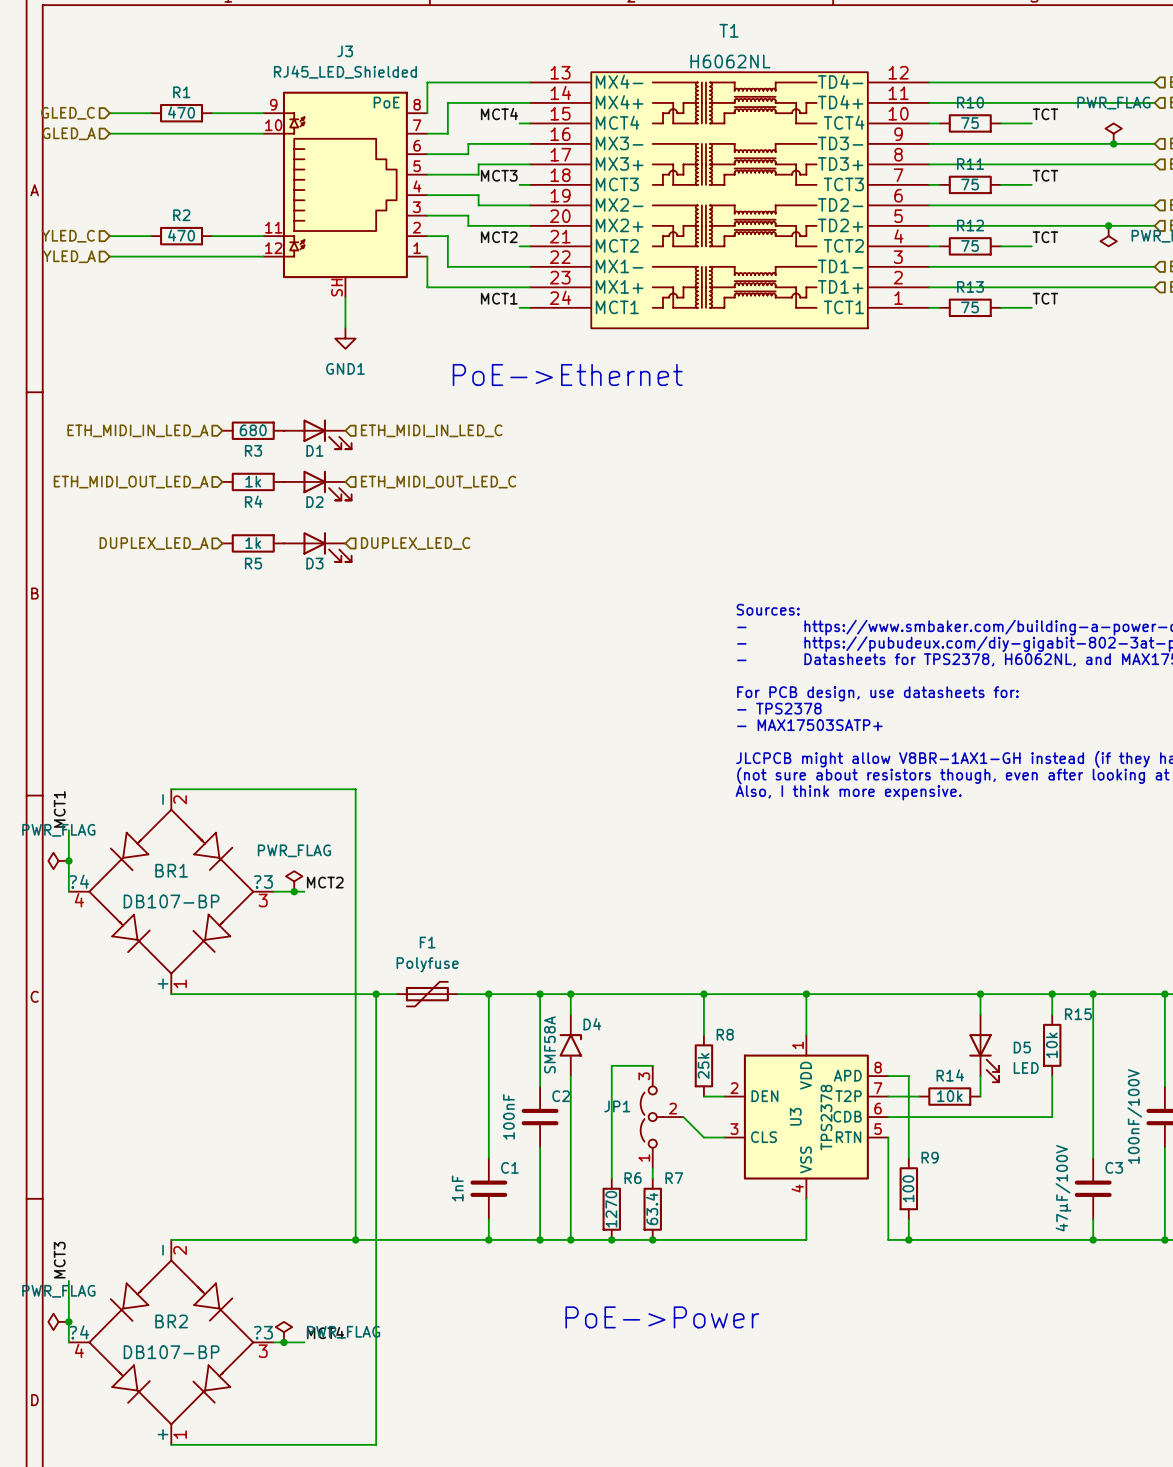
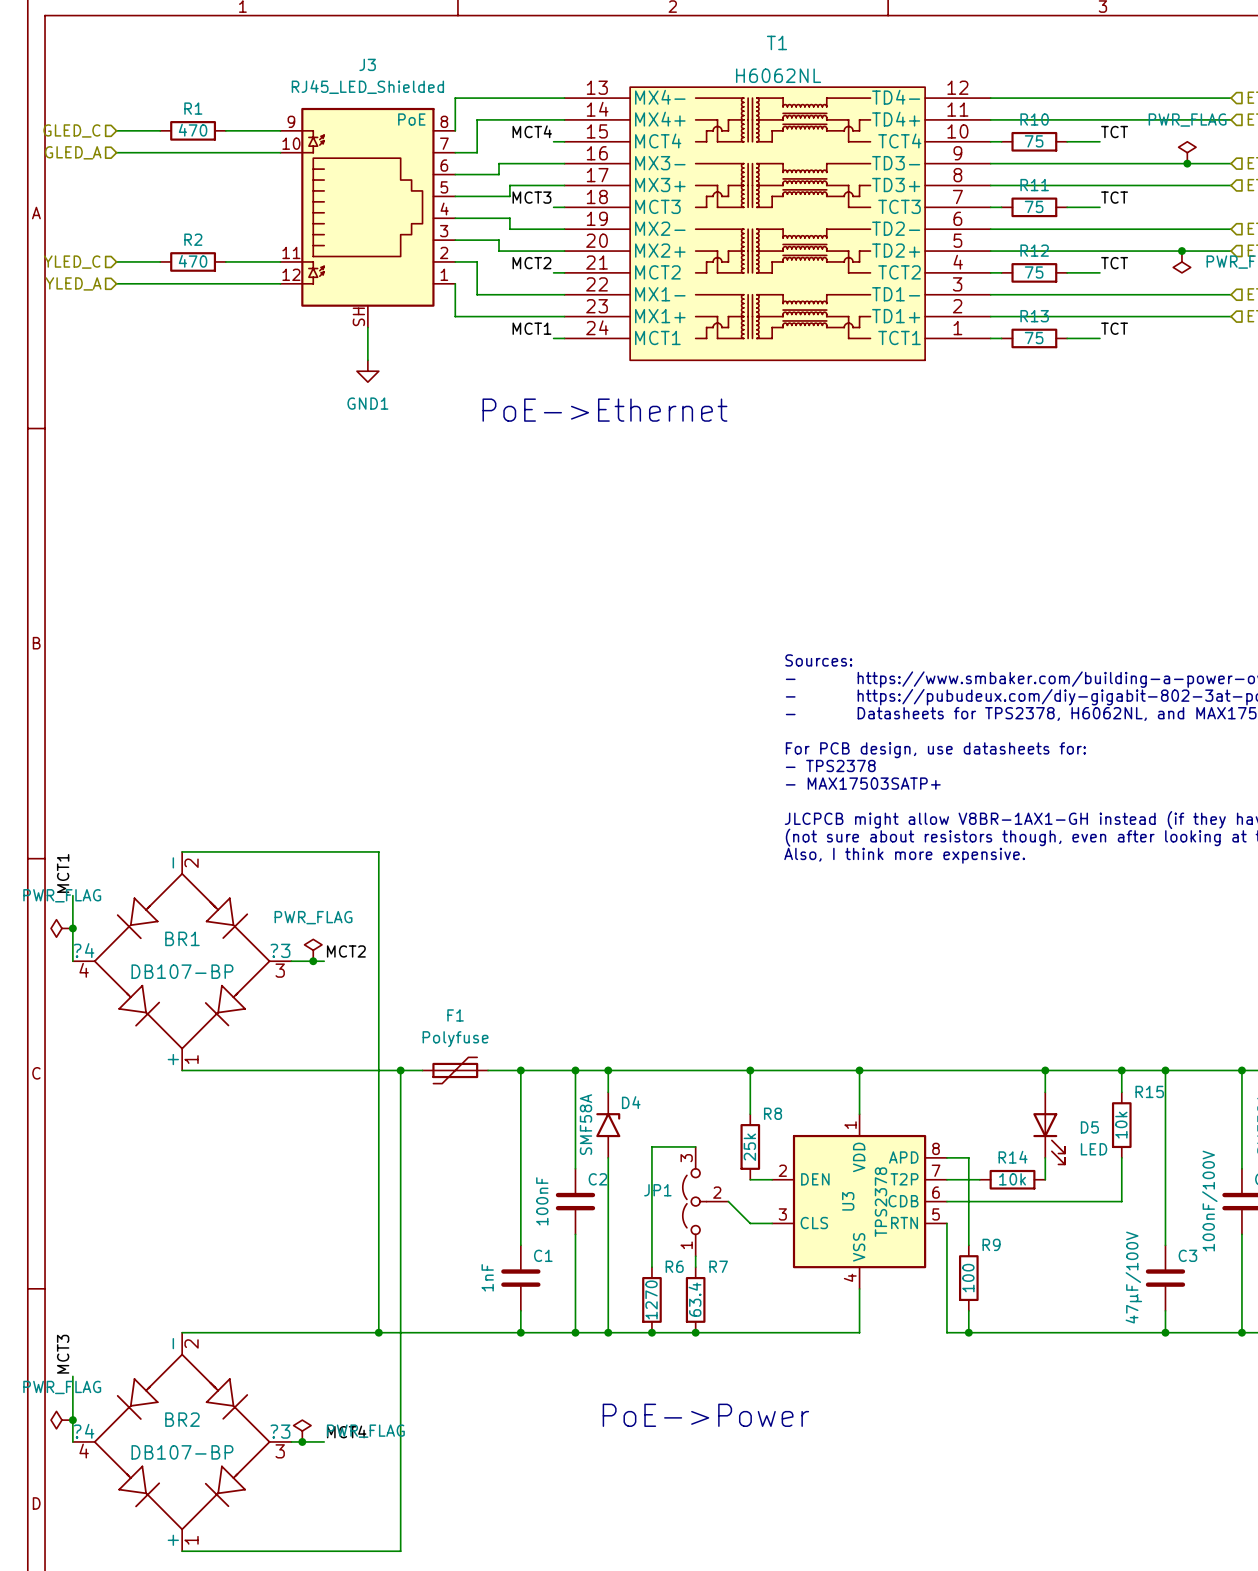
hierarchical label: ETH_MIDI_IN_LED_A (137, 430) -> none
R3: 680 (253, 430) -> none
hierarchical label: ETH_MIDI_IN_LED_C (431, 430) -> none
D1: (317, 434) -> none
R4: 1k (253, 481) -> none
hierarchical label: ETH_MIDI_OUT_LED_A (131, 482) -> none
hierarchical label: ETH_MIDI_OUT_LED_C (438, 482) -> none
D2: (317, 485) -> none
hierarchical label: DUPLEX_LED_A (154, 543) -> none
R5: 1k (253, 543) -> none
hierarchical label: DUPLEX_LED_C (415, 543) -> none
D3: (317, 547) -> none

